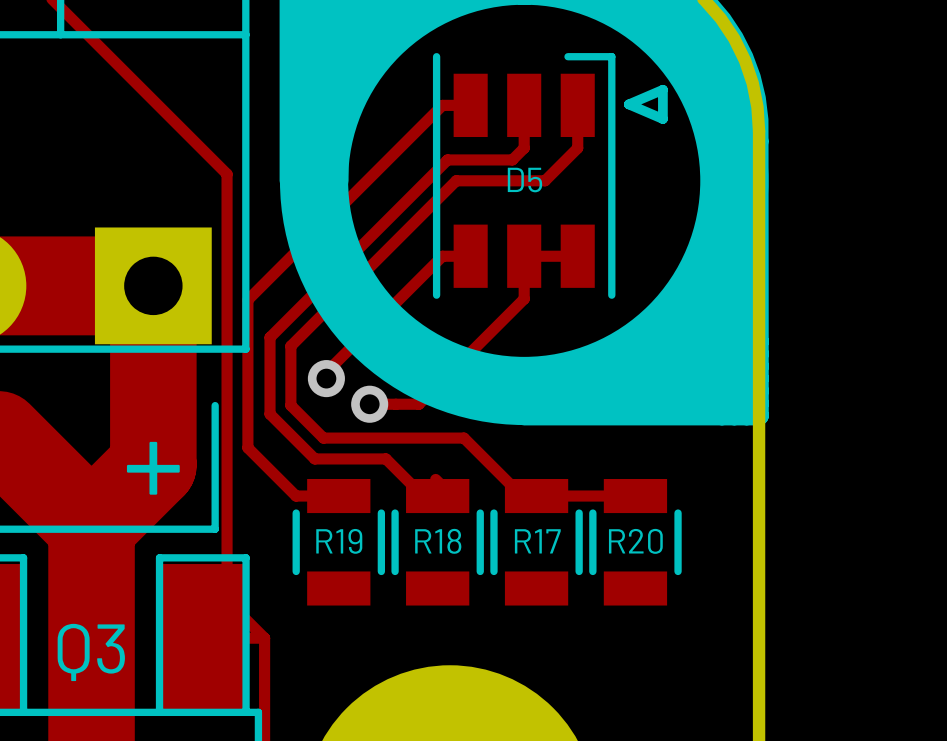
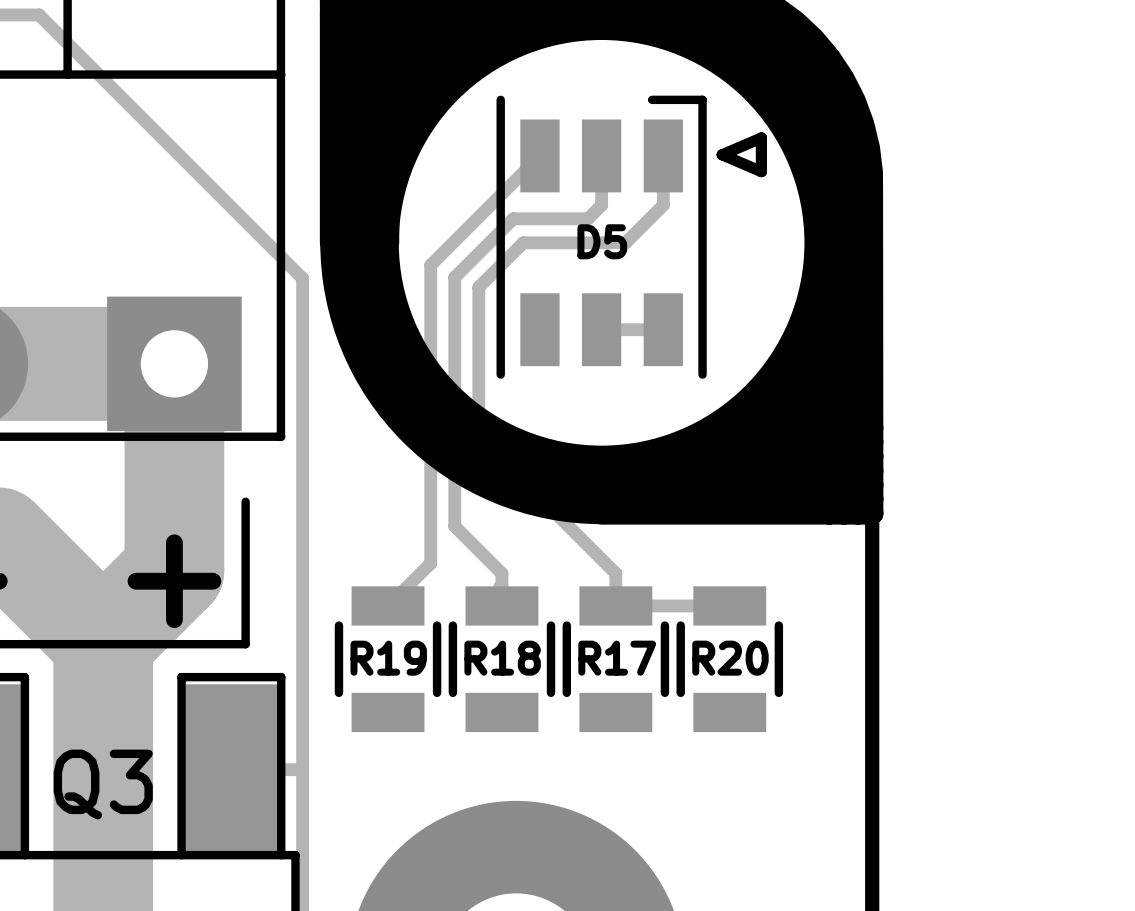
track: (470, 105) (442, 105) (247, 299) (247, 447) (296, 496) (338, 496) -> (539, 155) (430, 265) (430, 563) (388, 605)
track: (227, 174) (227, 600) (264, 638) -> (259, 235) (302, 278) (302, 769)
track: (396, 210) (270, 337) (270, 414) (314, 458) (385, 458) (423, 496) (437, 496) -> (454, 277) (454, 526) (501, 573) (501, 605)
track: (417, 219) (290, 346) (290, 405) (323, 438) (464, 438) (521, 496) (536, 496) -> (478, 287) (478, 436) (615, 573) (615, 605)
track: (470, 256) (442, 256) (326, 372) (326, 378) -> none
track: (524, 256) (524, 299) (418, 404) (369, 404) -> none
via: (326, 378) -> none
via: (369, 404) -> none

